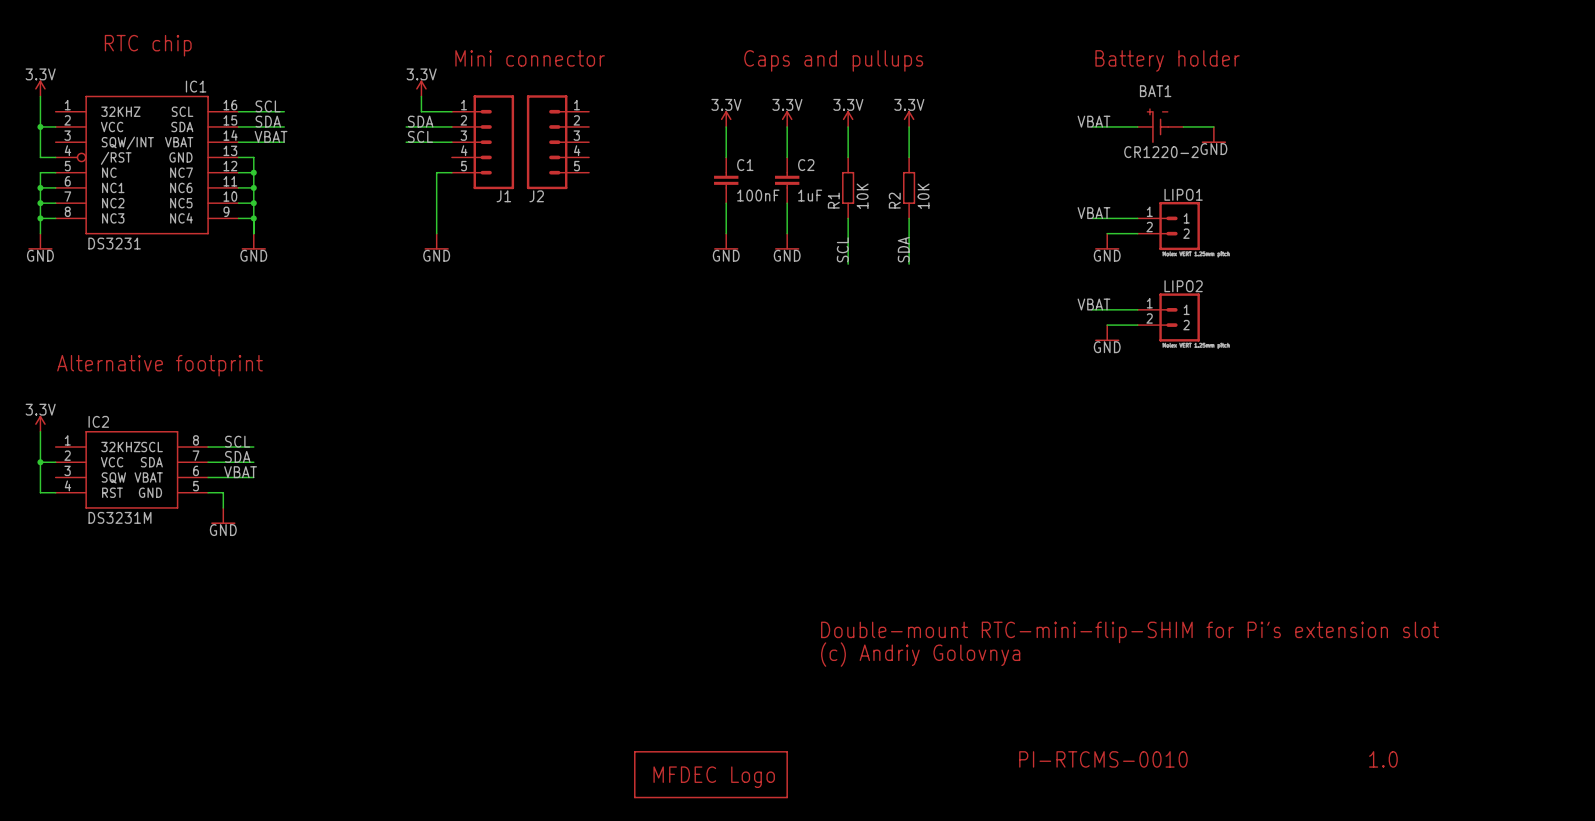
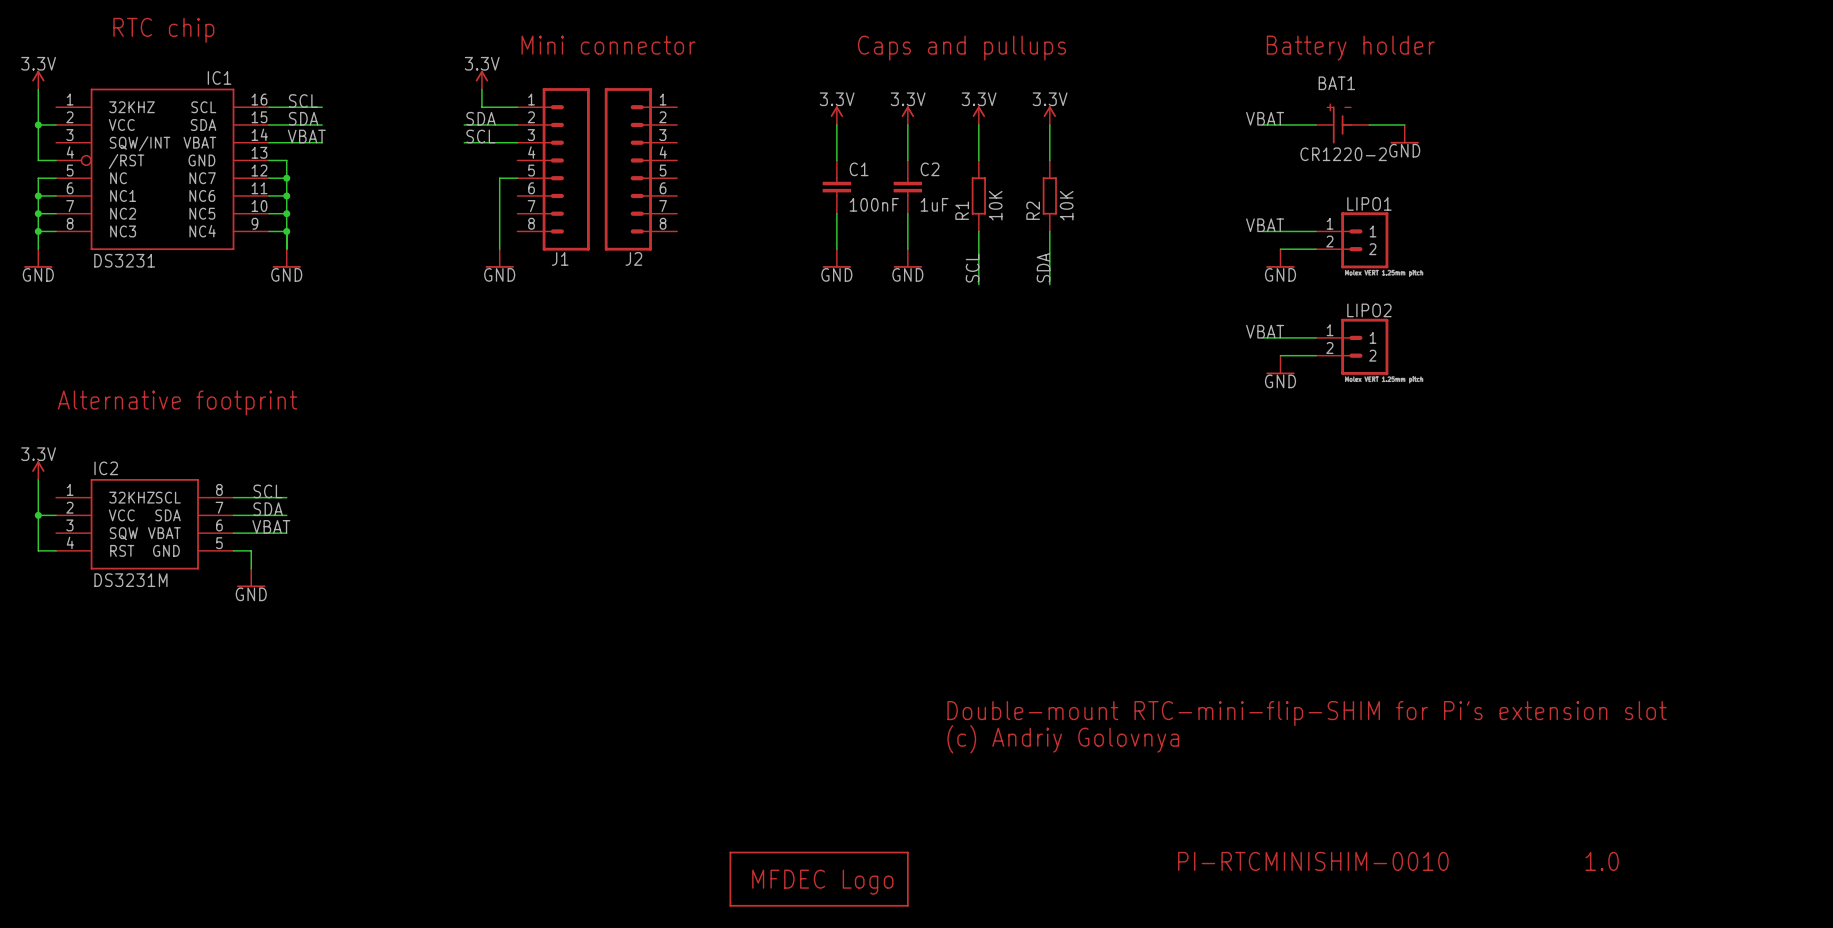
J1 symbol: [451, 95, 515, 190] -> [517, 88, 590, 251]
J2 symbol: [526, 95, 590, 190] -> [604, 88, 678, 251]
J1 name position: J1 (503, 196) -> J1 (560, 258)
J2 name position: J2 (536, 196) -> J2 (633, 258)
text: PI-RTCMS-0010 (1103, 759) -> PI-RTCMINISHIM-0010 (1313, 861)

